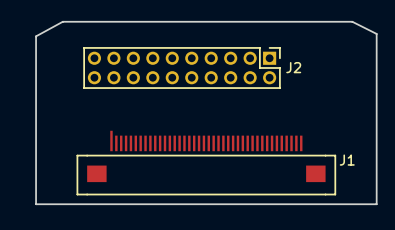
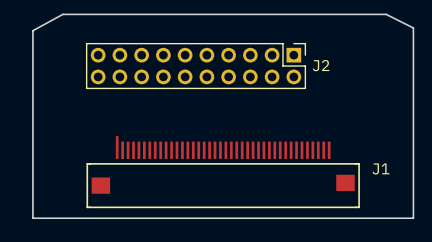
J1 footprint: [76, 130, 337, 196] -> [86, 136, 360, 209]

